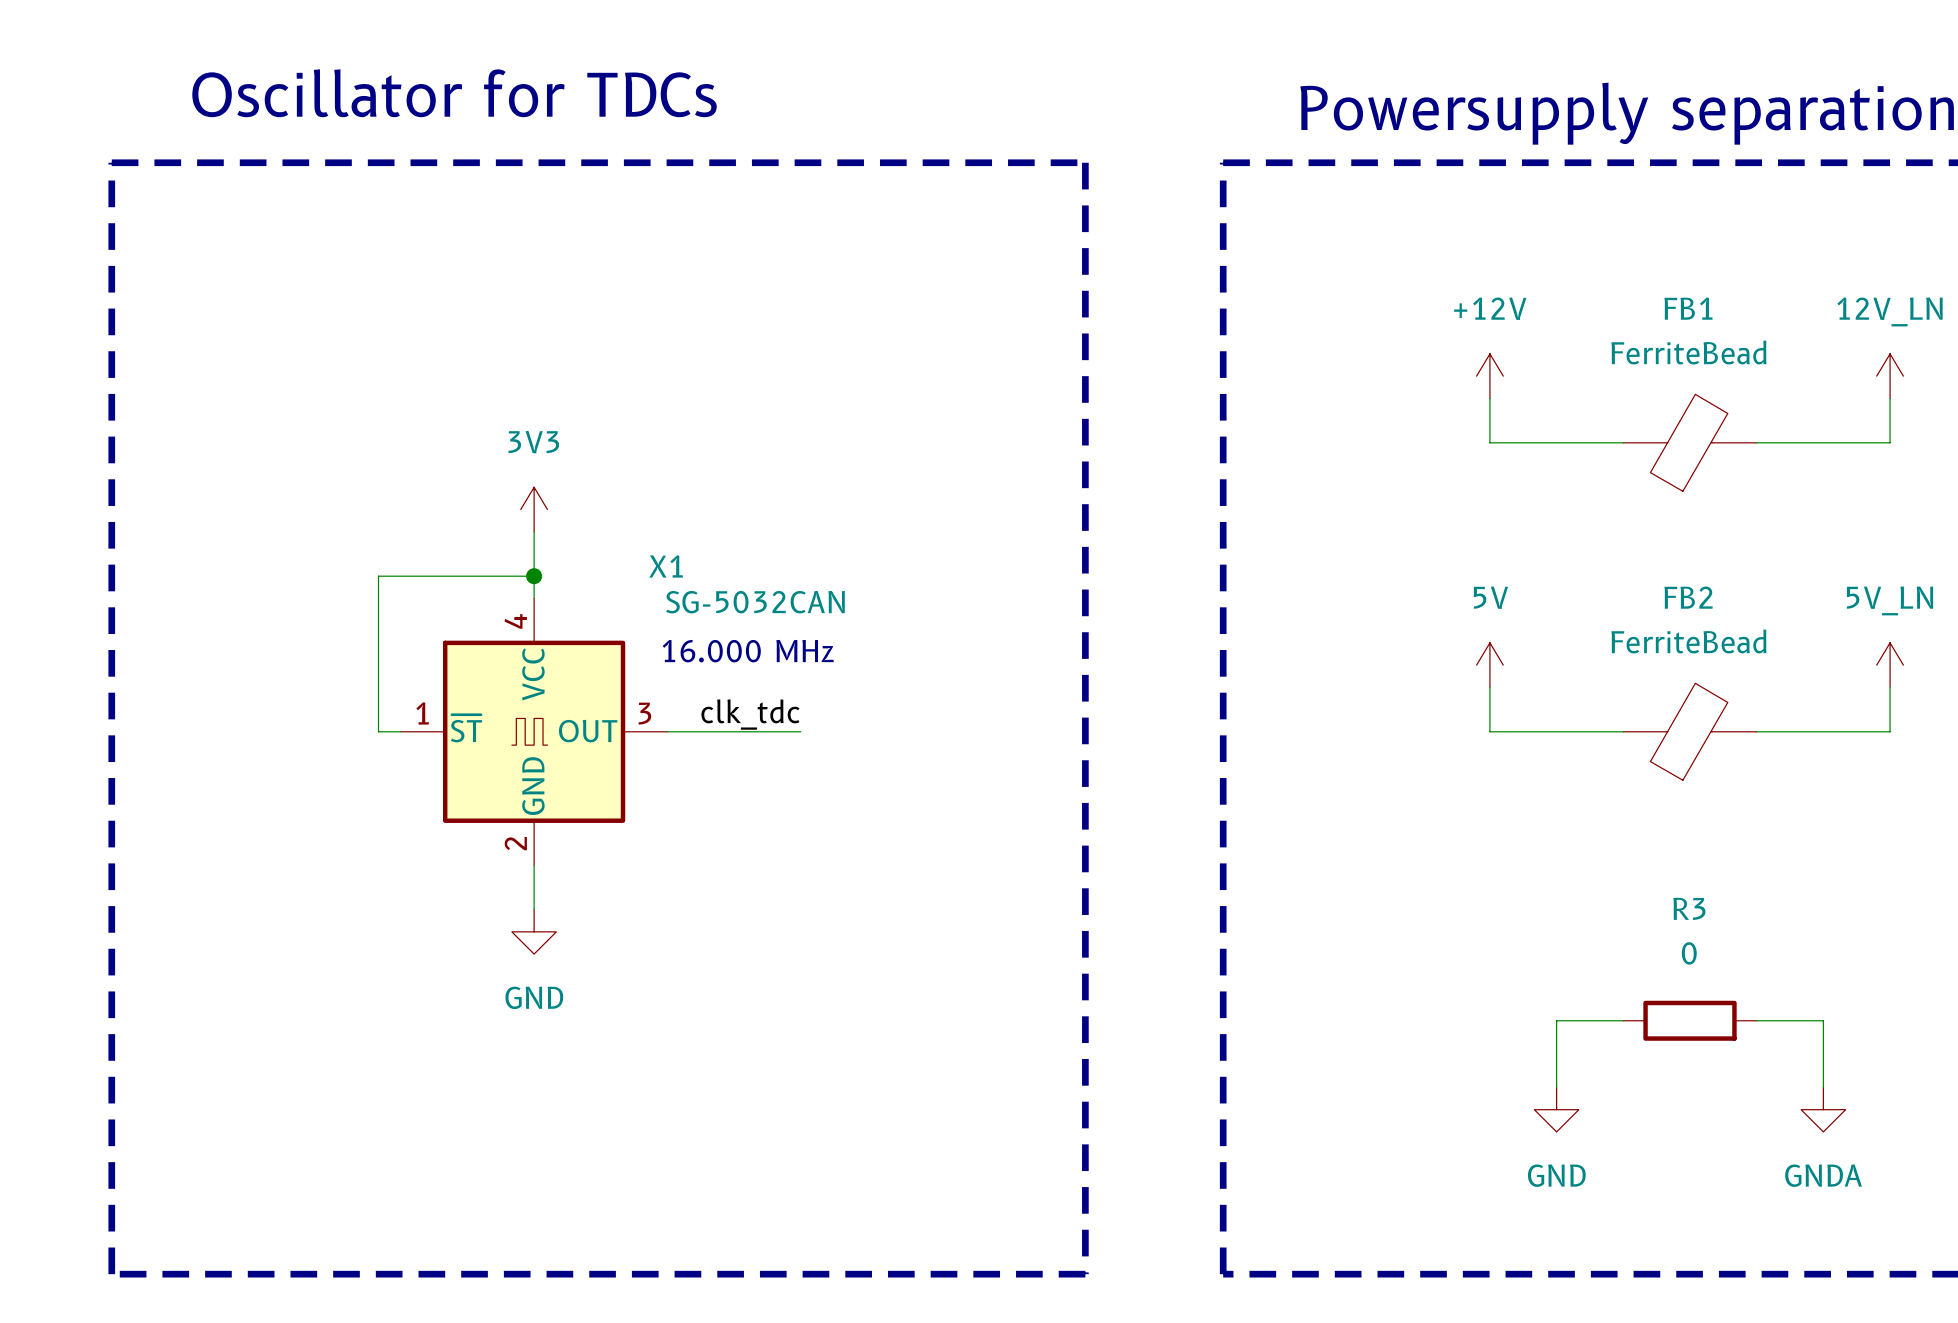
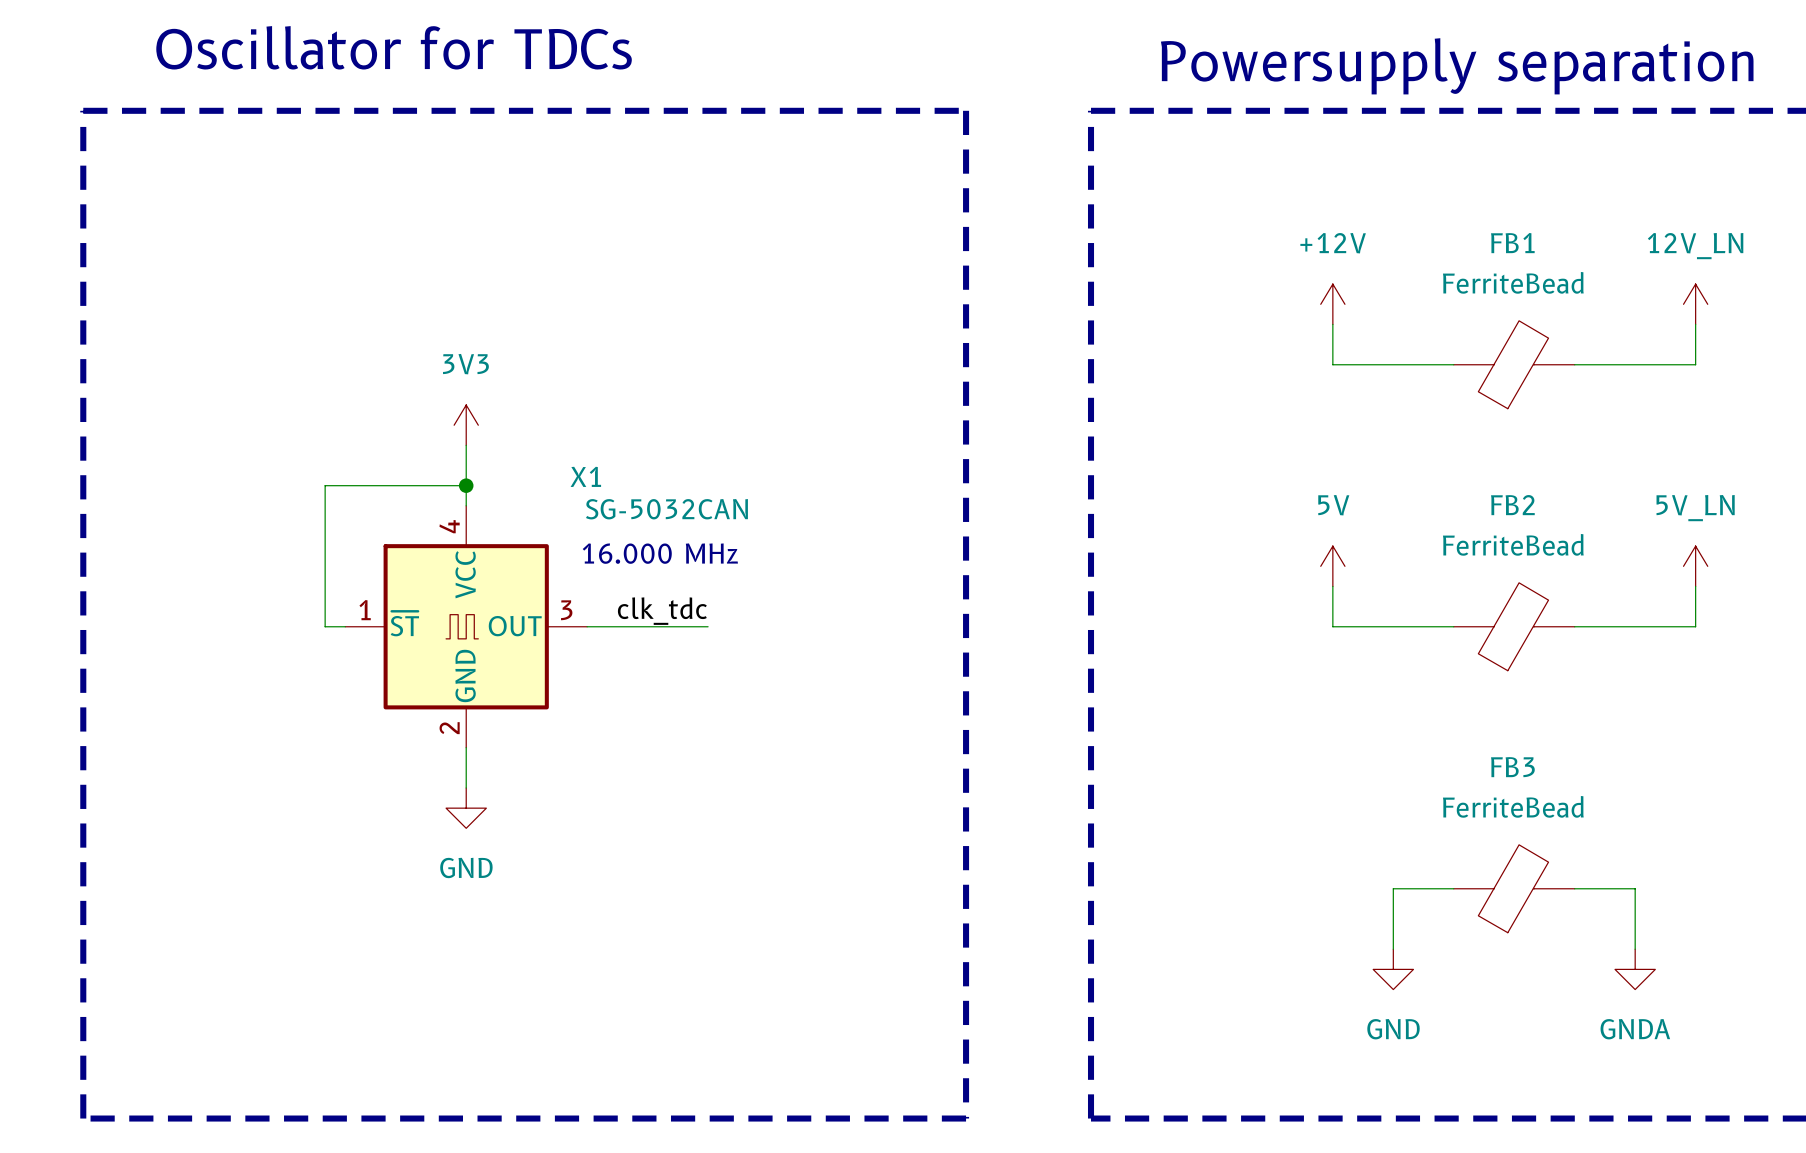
R3: 0 (1690, 1020) -> none
FB3: none -> FerriteBead (1514, 888)

